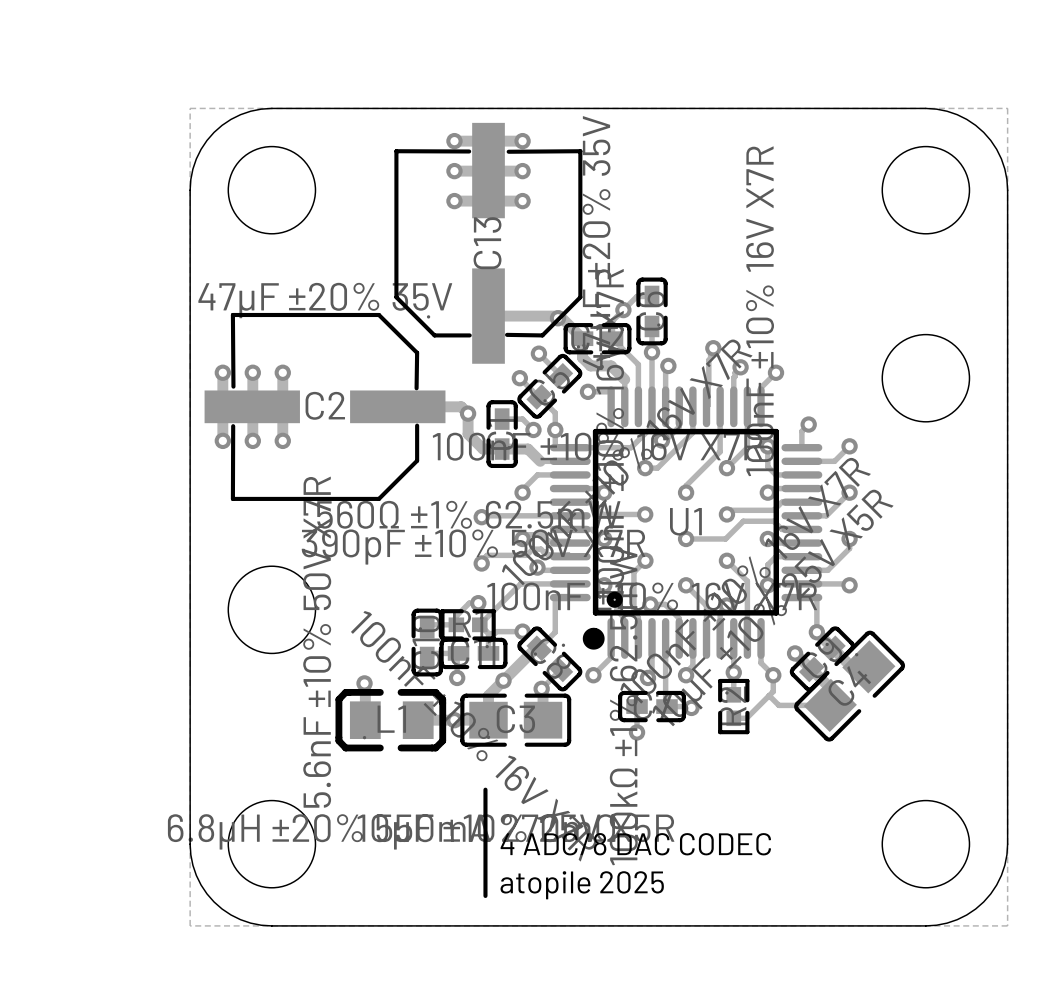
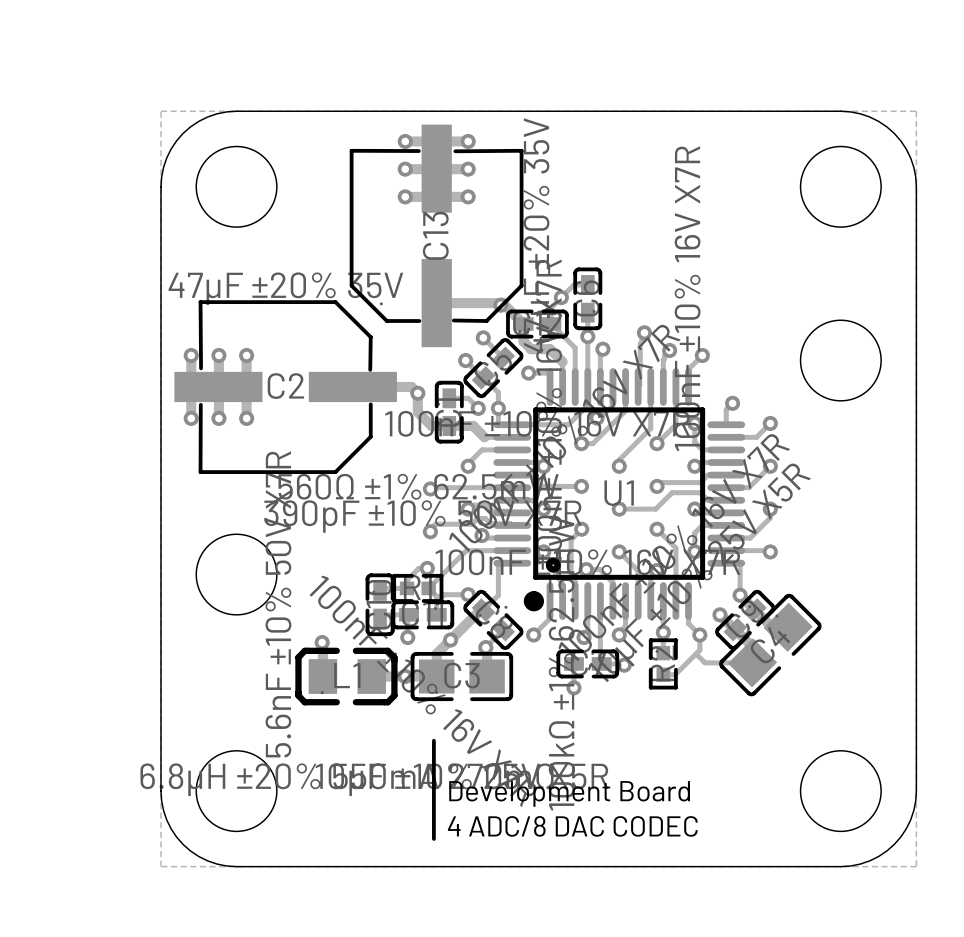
text: 4 ADC/8 DAC CODEC (635, 844) -> Development Board (569, 793)
text: atopile 2025 (582, 885) -> 4 ADC/8 DAC CODEC (572, 826)

